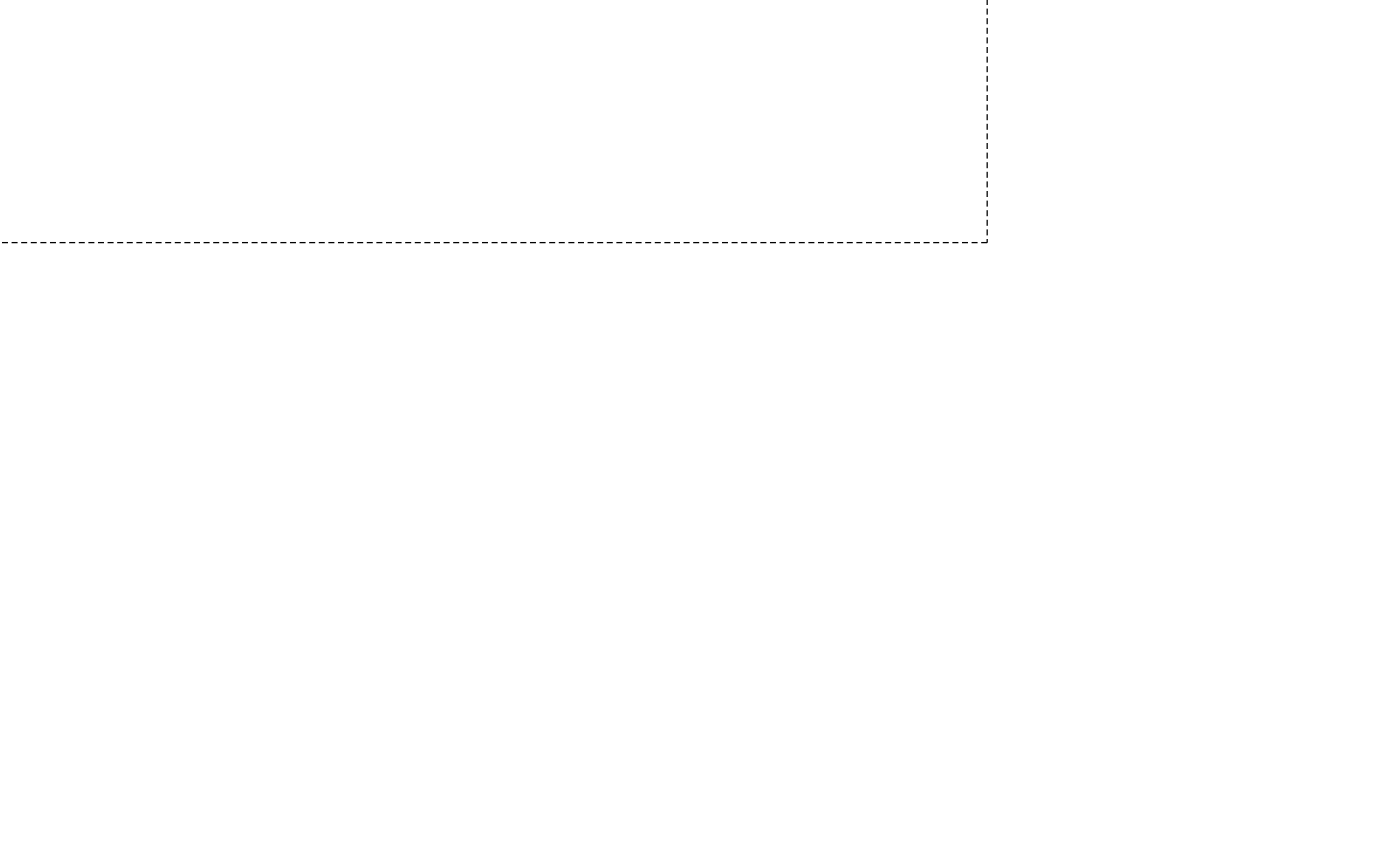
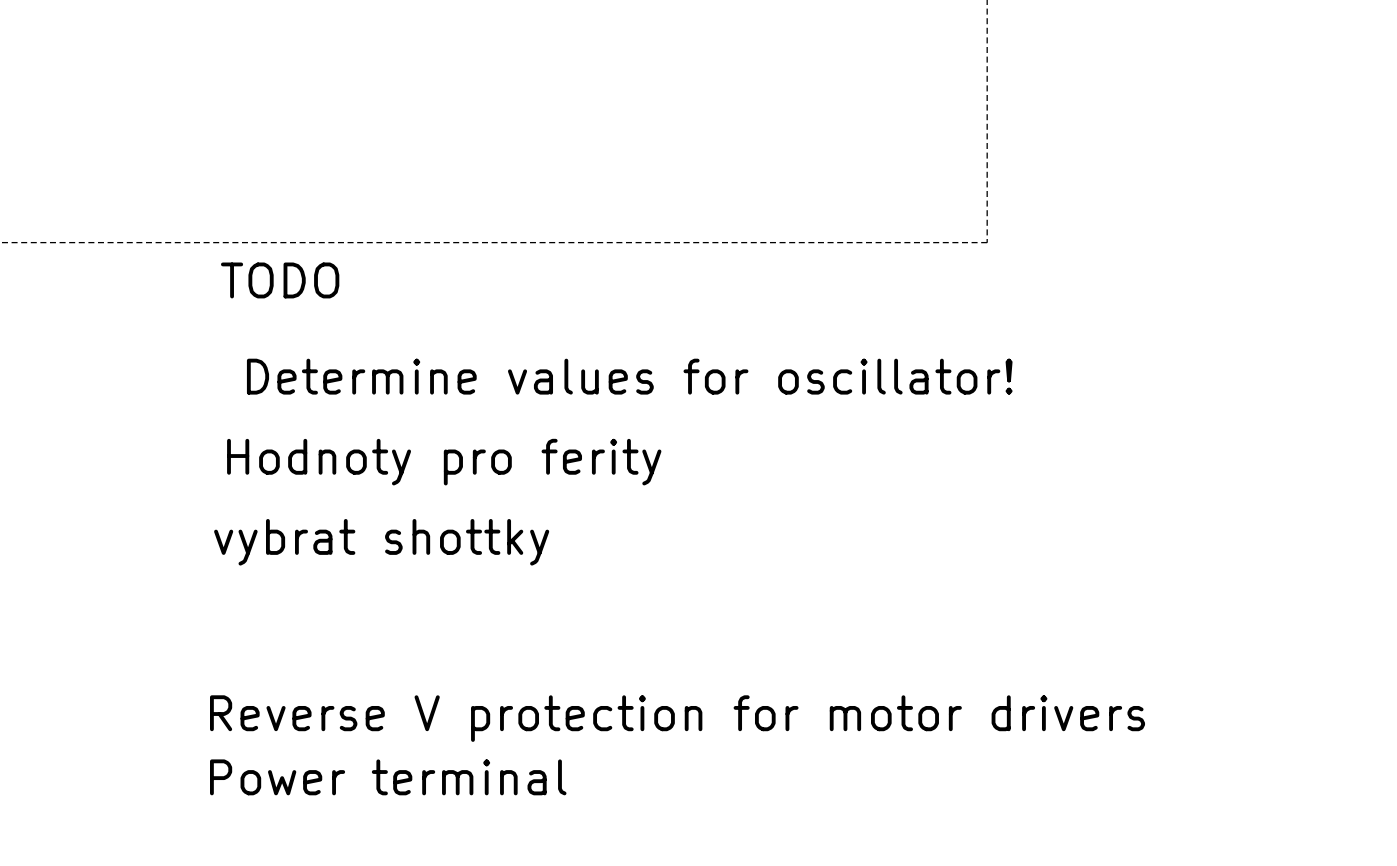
text: none -> TODO (280, 280)
text: none -> Determine values for oscillator! (629, 376)
text: none -> Hodnoty pro ferity (444, 462)
text: none -> vybrat shottky (381, 542)
text: none -> Reverse V protection for motor drivers (677, 718)
text: none -> Power terminal (388, 777)

